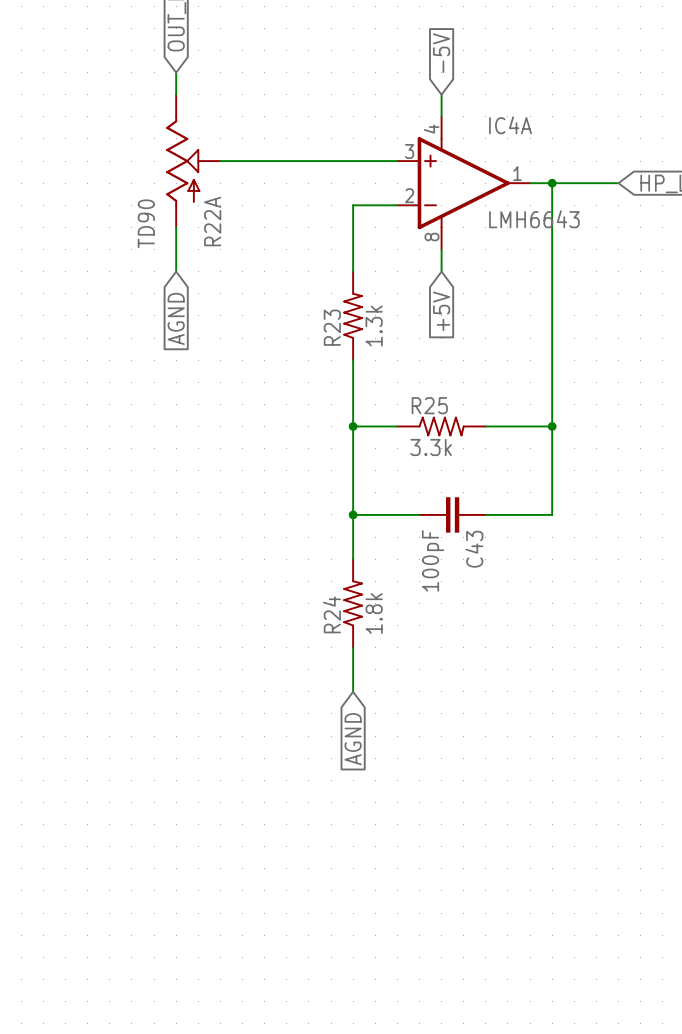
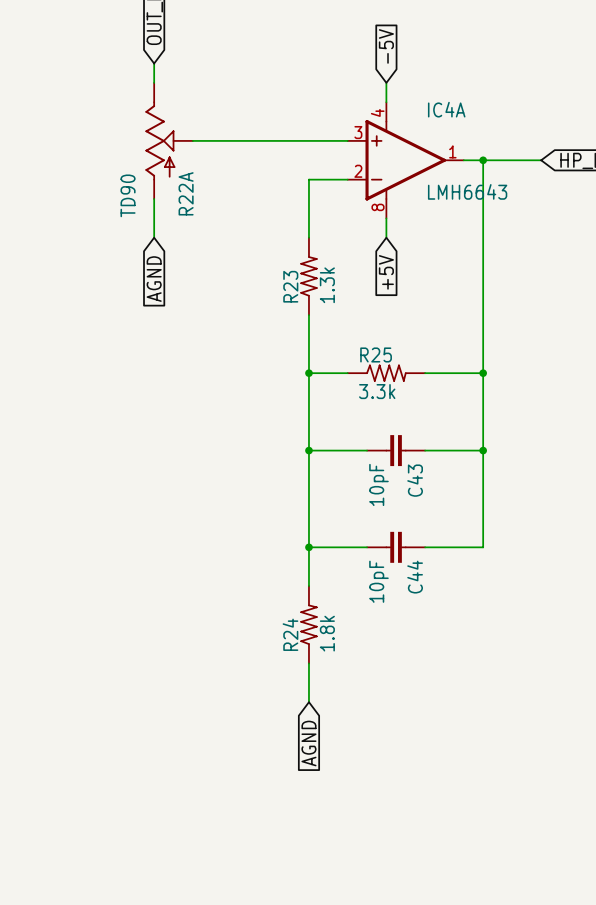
wire: none -> (483, 450) (483, 547) (425, 547)
junction: none -> (483, 450)
C43 value: 100pF (433, 560) -> 10pF (378, 484)
R24 position: (353, 603) -> (308, 624)
wire: none -> (308, 547) (367, 547)
junction: none -> (308, 547)
C44: none -> 10pF (396, 547)
global label position: AGND (353, 739) -> AGND (308, 743)
wire: none -> (308, 663) (308, 702)

